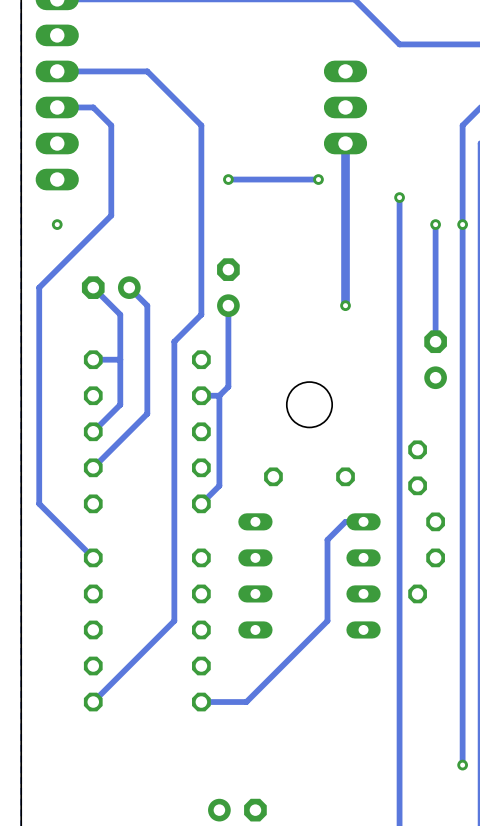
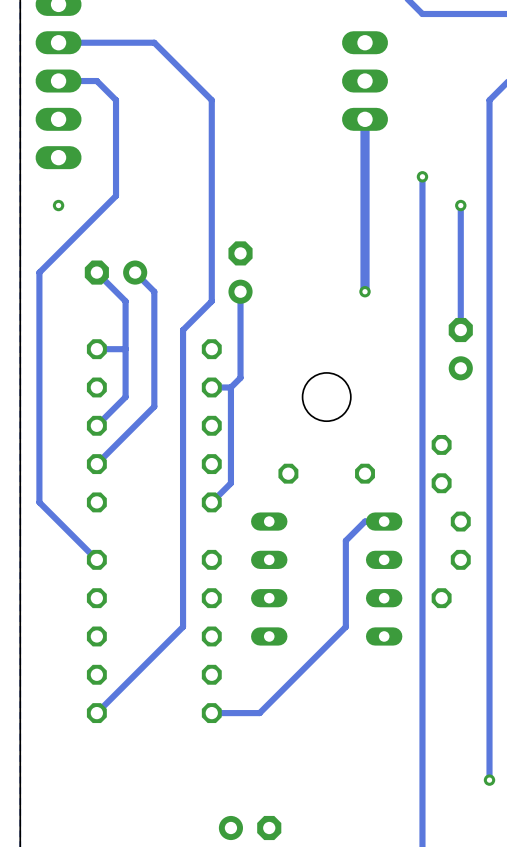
via: (228, 179) -> none
track: (318, 179) (228, 179) -> none
via: (318, 179) -> none
via: (462, 224) -> none

